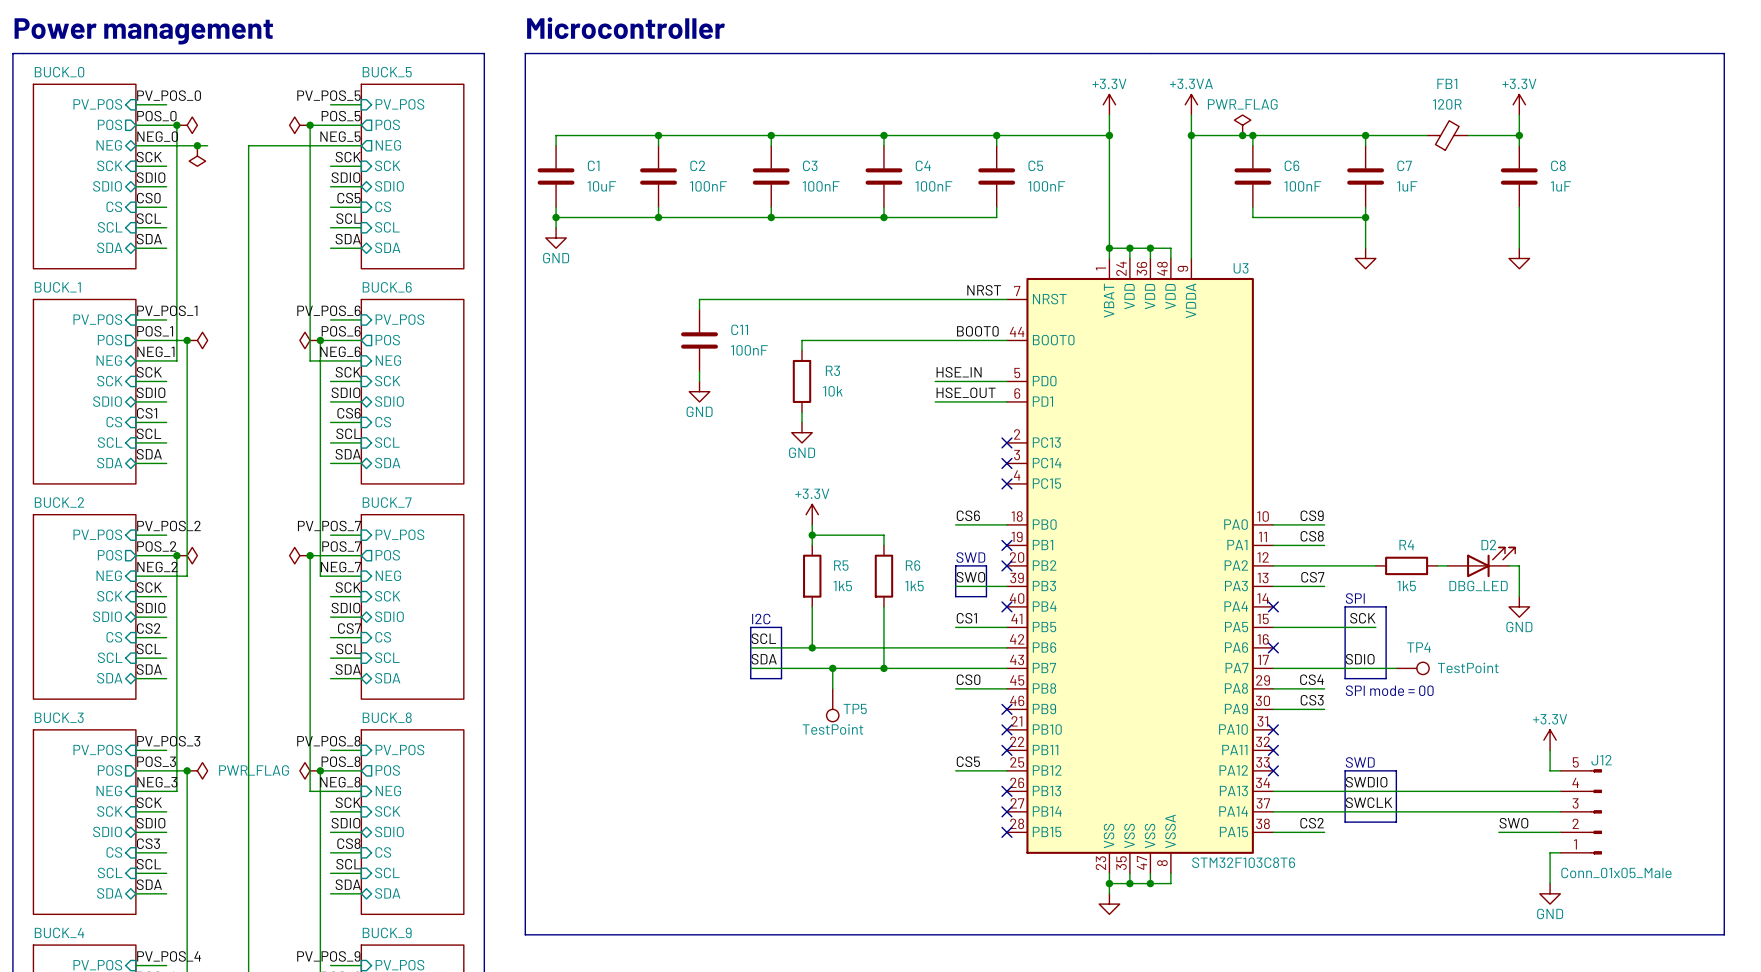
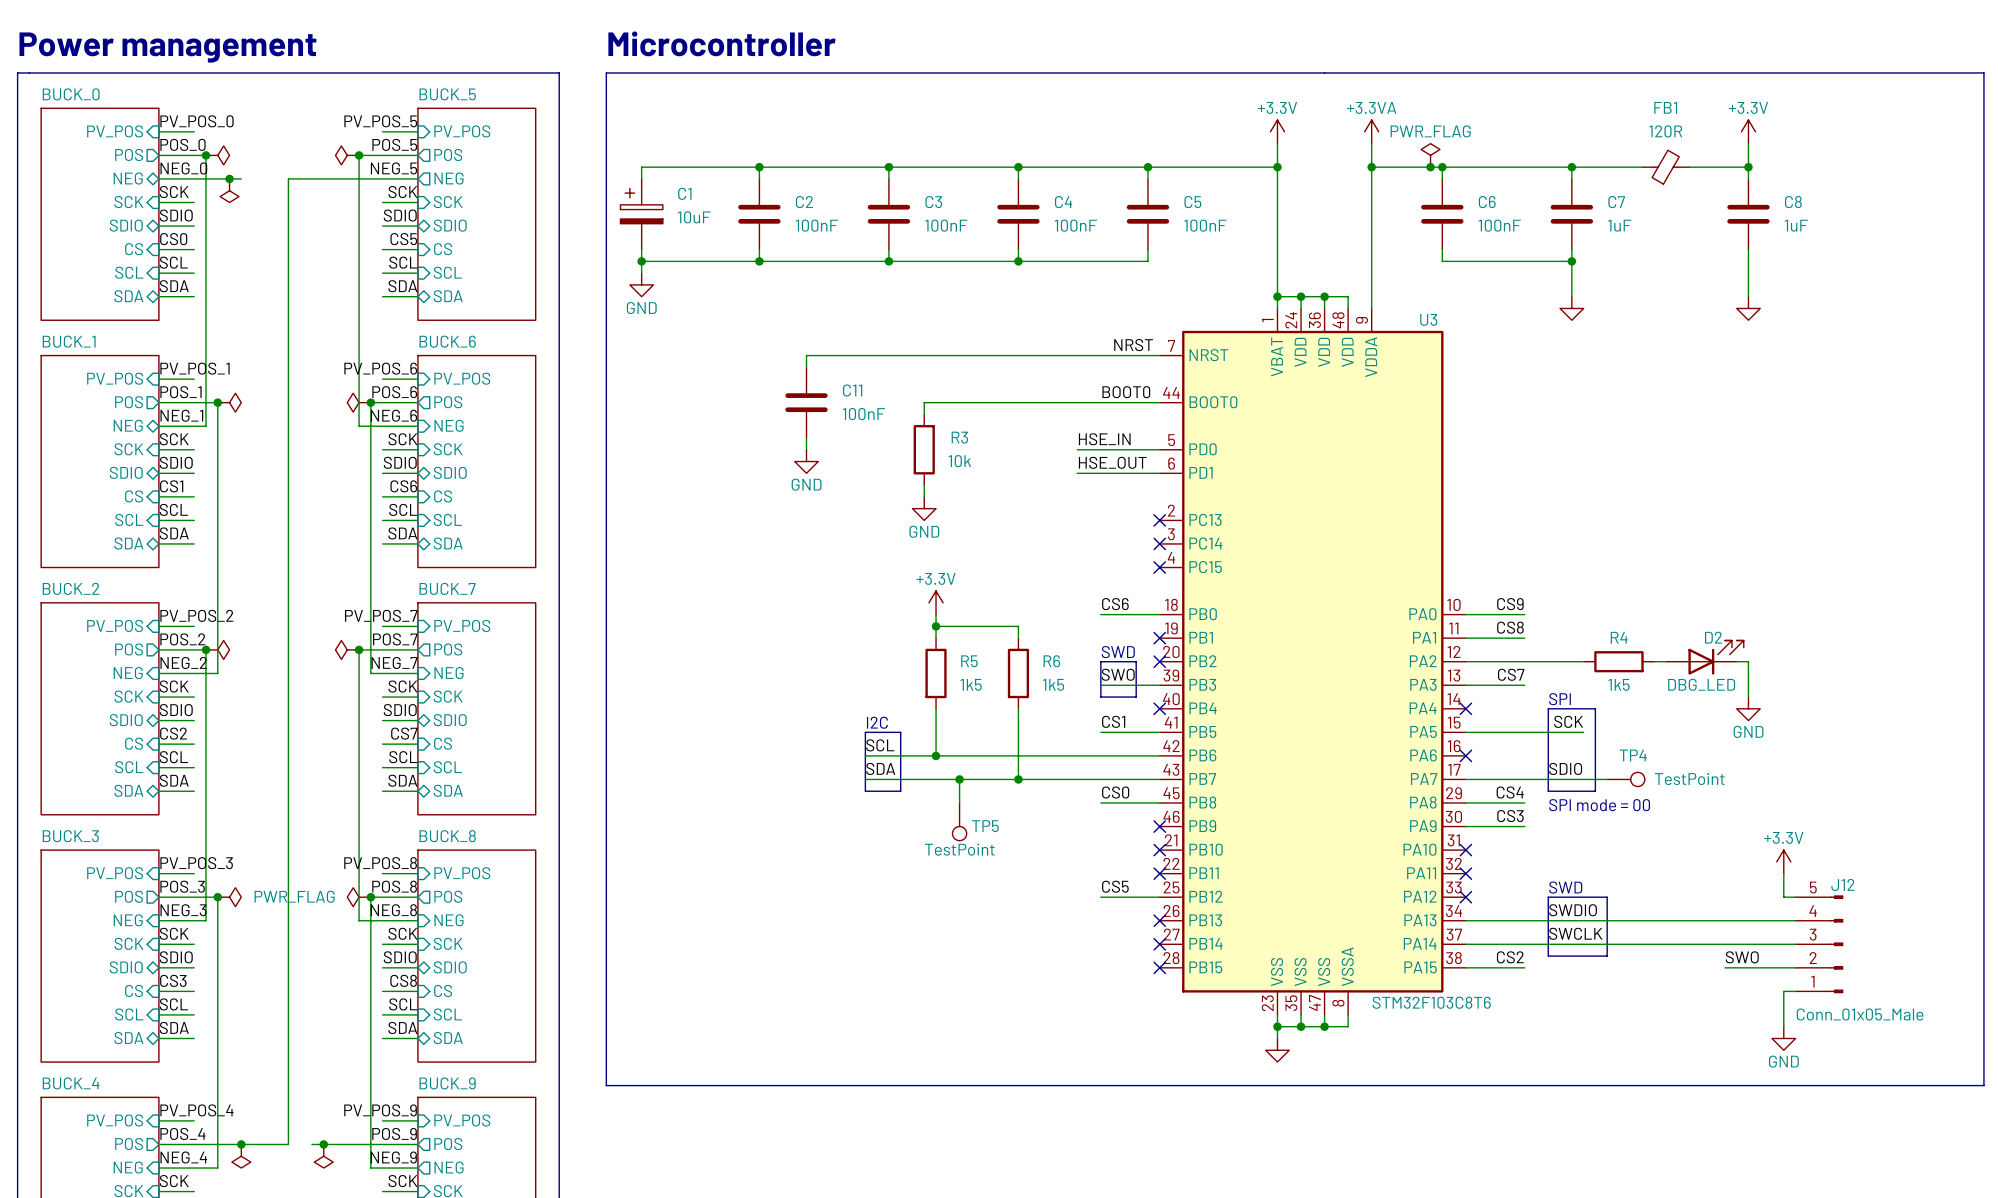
C1 symbol: [537, 145, 575, 208] -> [620, 178, 663, 250]

